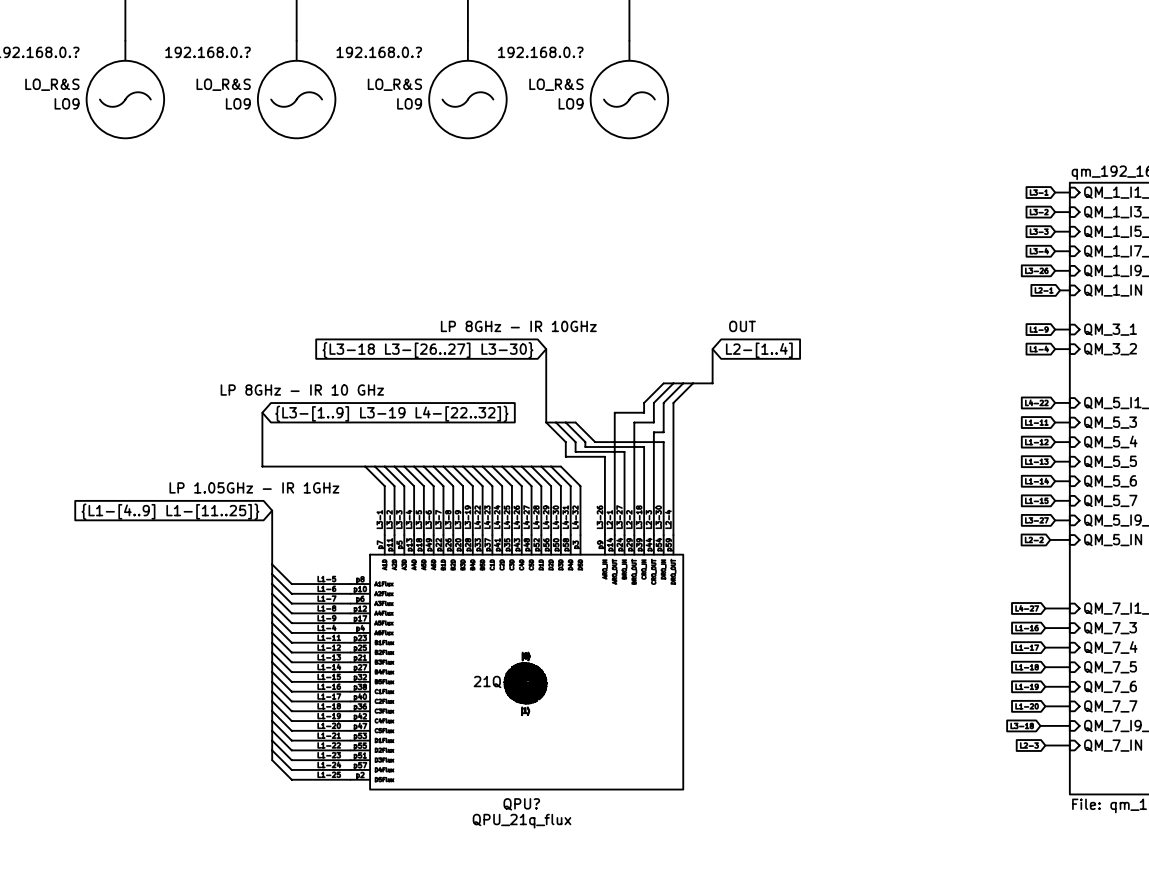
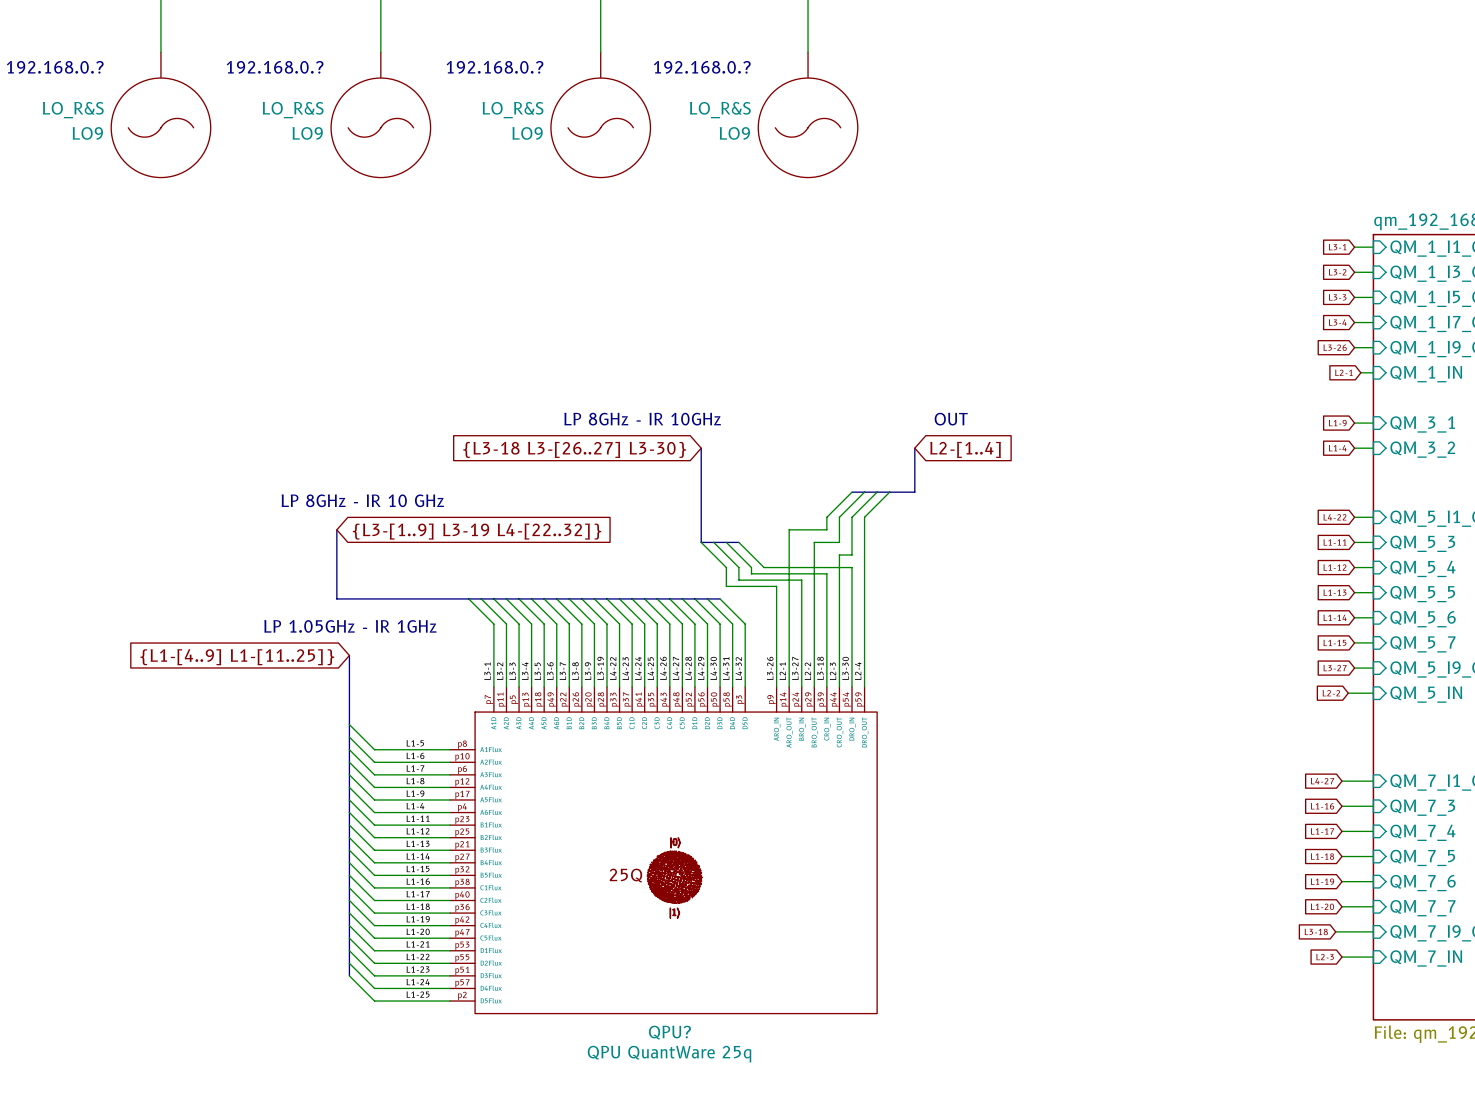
QPU? text: 21Q (487, 681) -> 25Q (625, 875)
QPU? value: QPU_21q_flux (521, 821) -> QPU QuantWare 25q (669, 1054)

